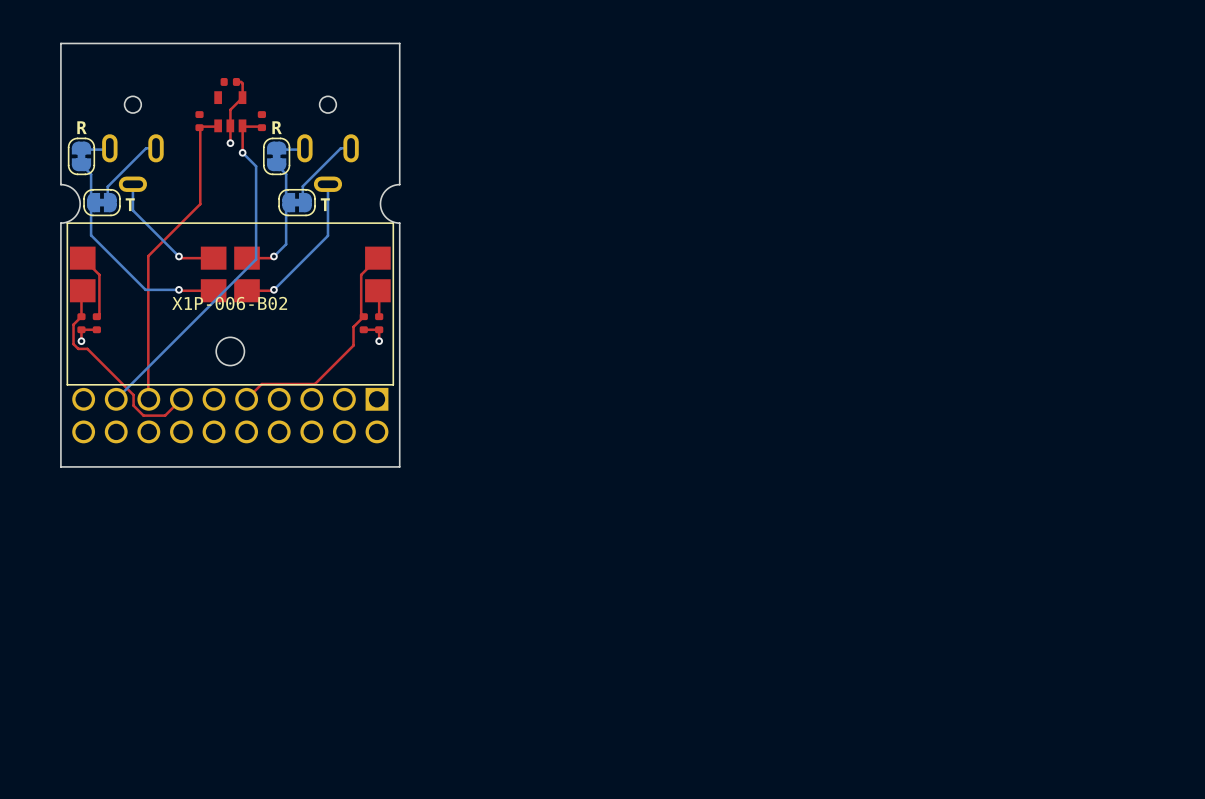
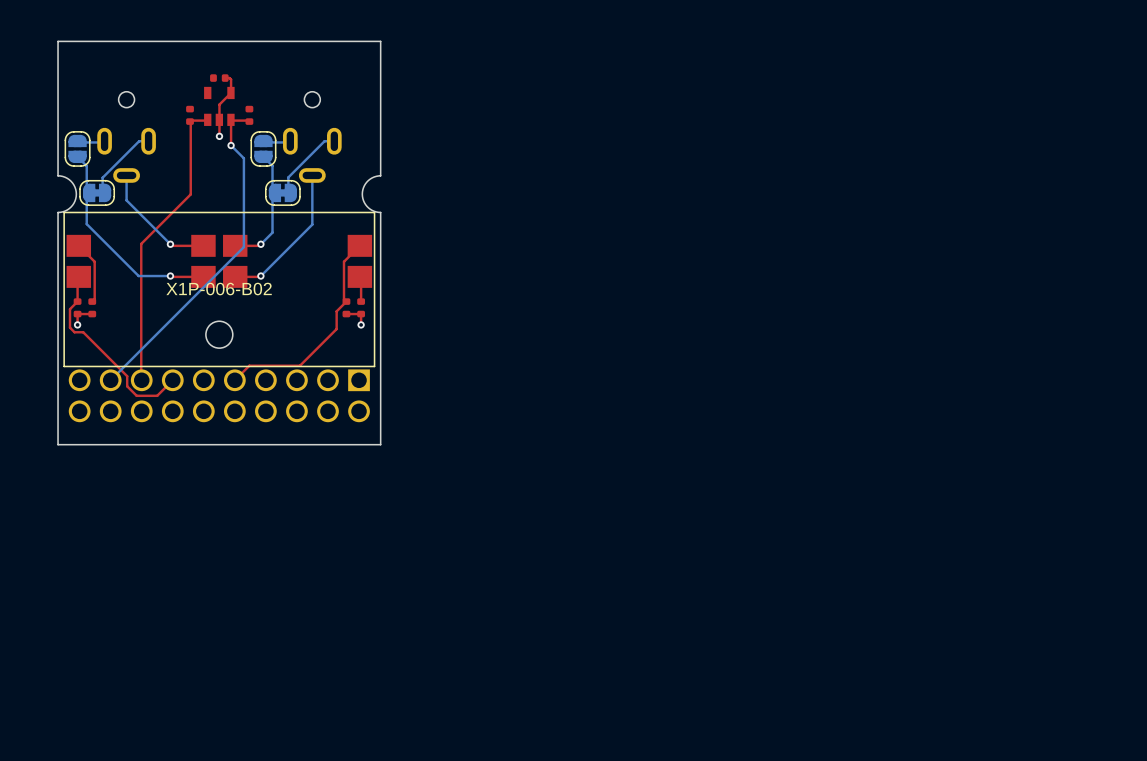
text: R (82, 127) -> none
text: R (277, 127) -> none
part footprint: [67, 137, 96, 176] -> [64, 131, 91, 167]
part footprint: [263, 137, 291, 176] -> [250, 131, 277, 167]
text: T (130, 204) -> none
text: T (325, 204) -> none

